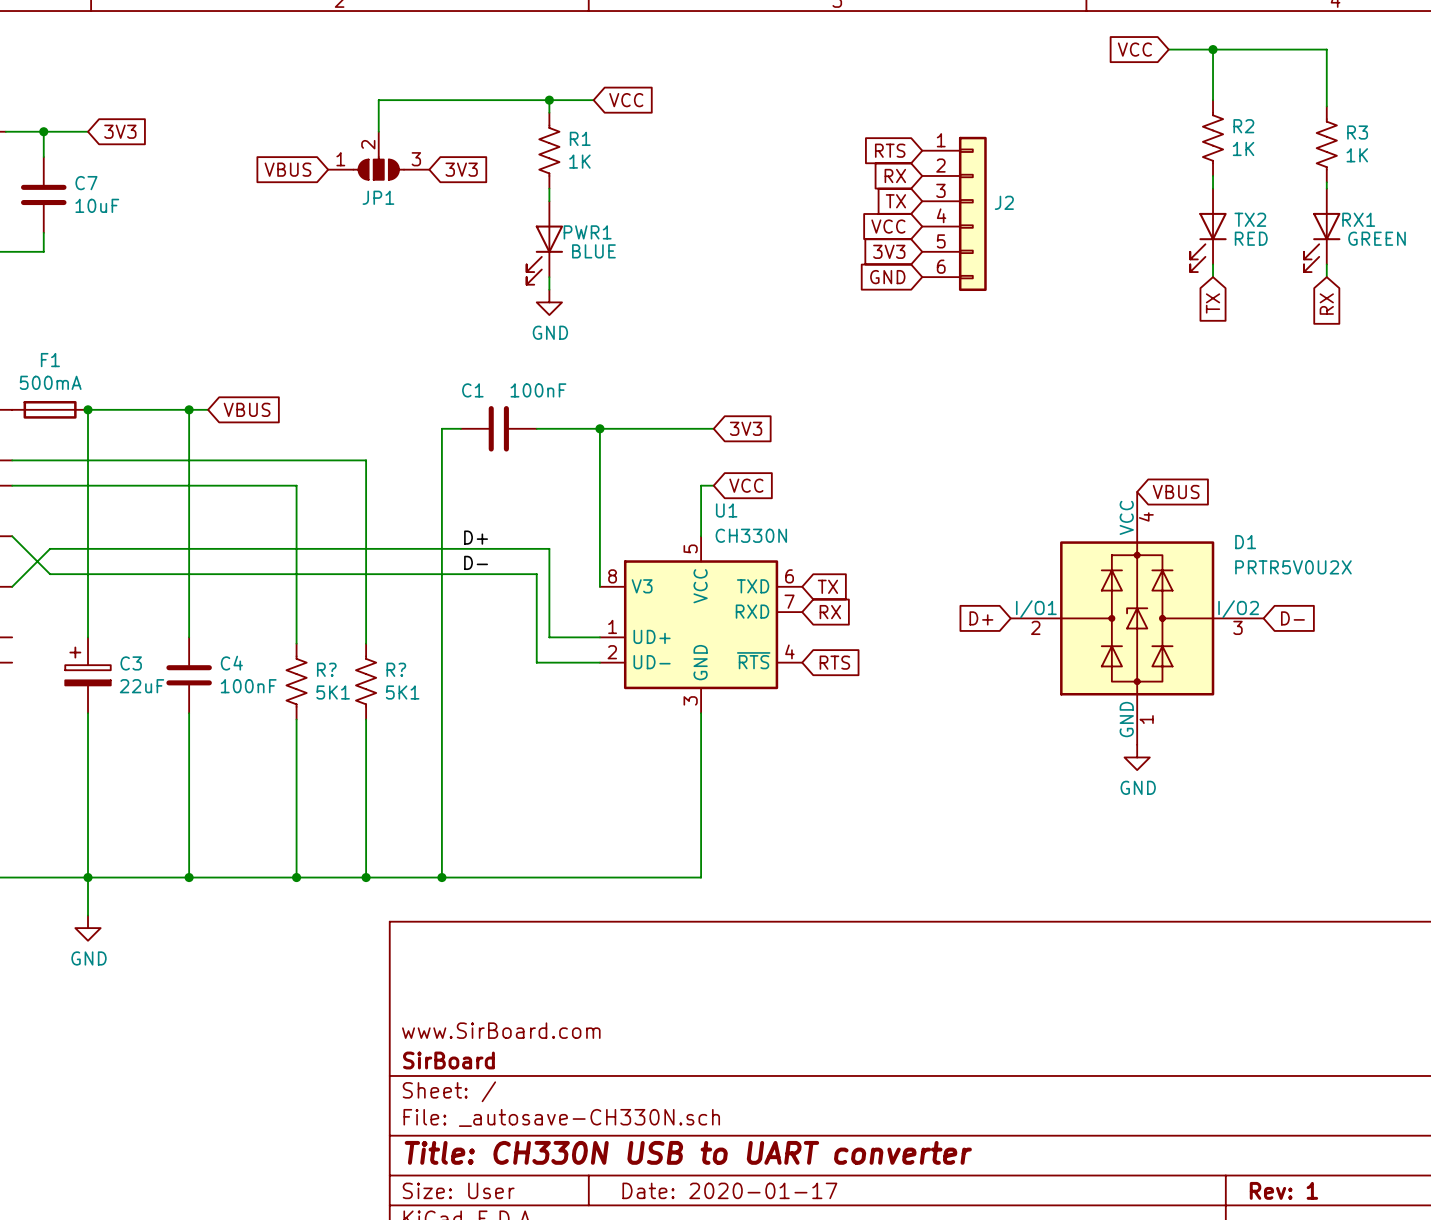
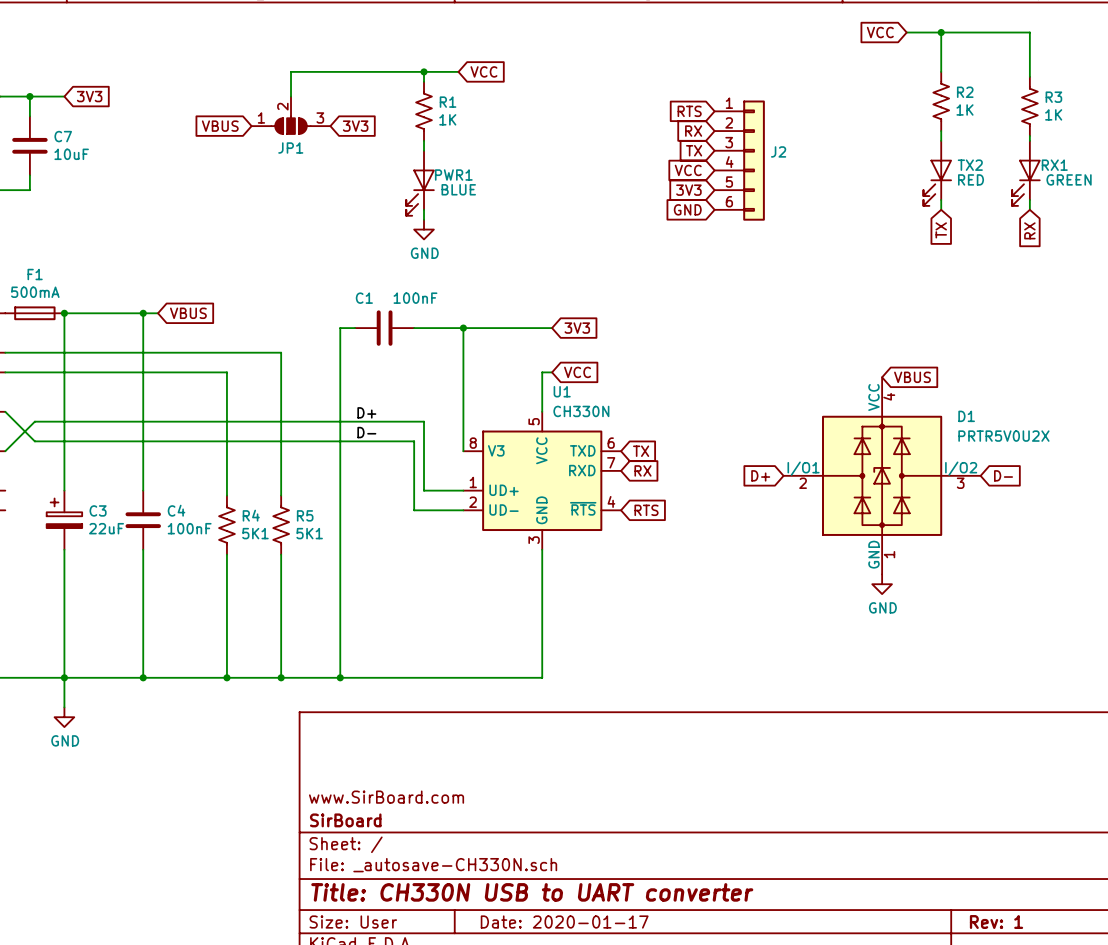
R? name: R? (326, 669) -> R4 (251, 515)
R? name: R? (396, 669) -> R5 (305, 515)

